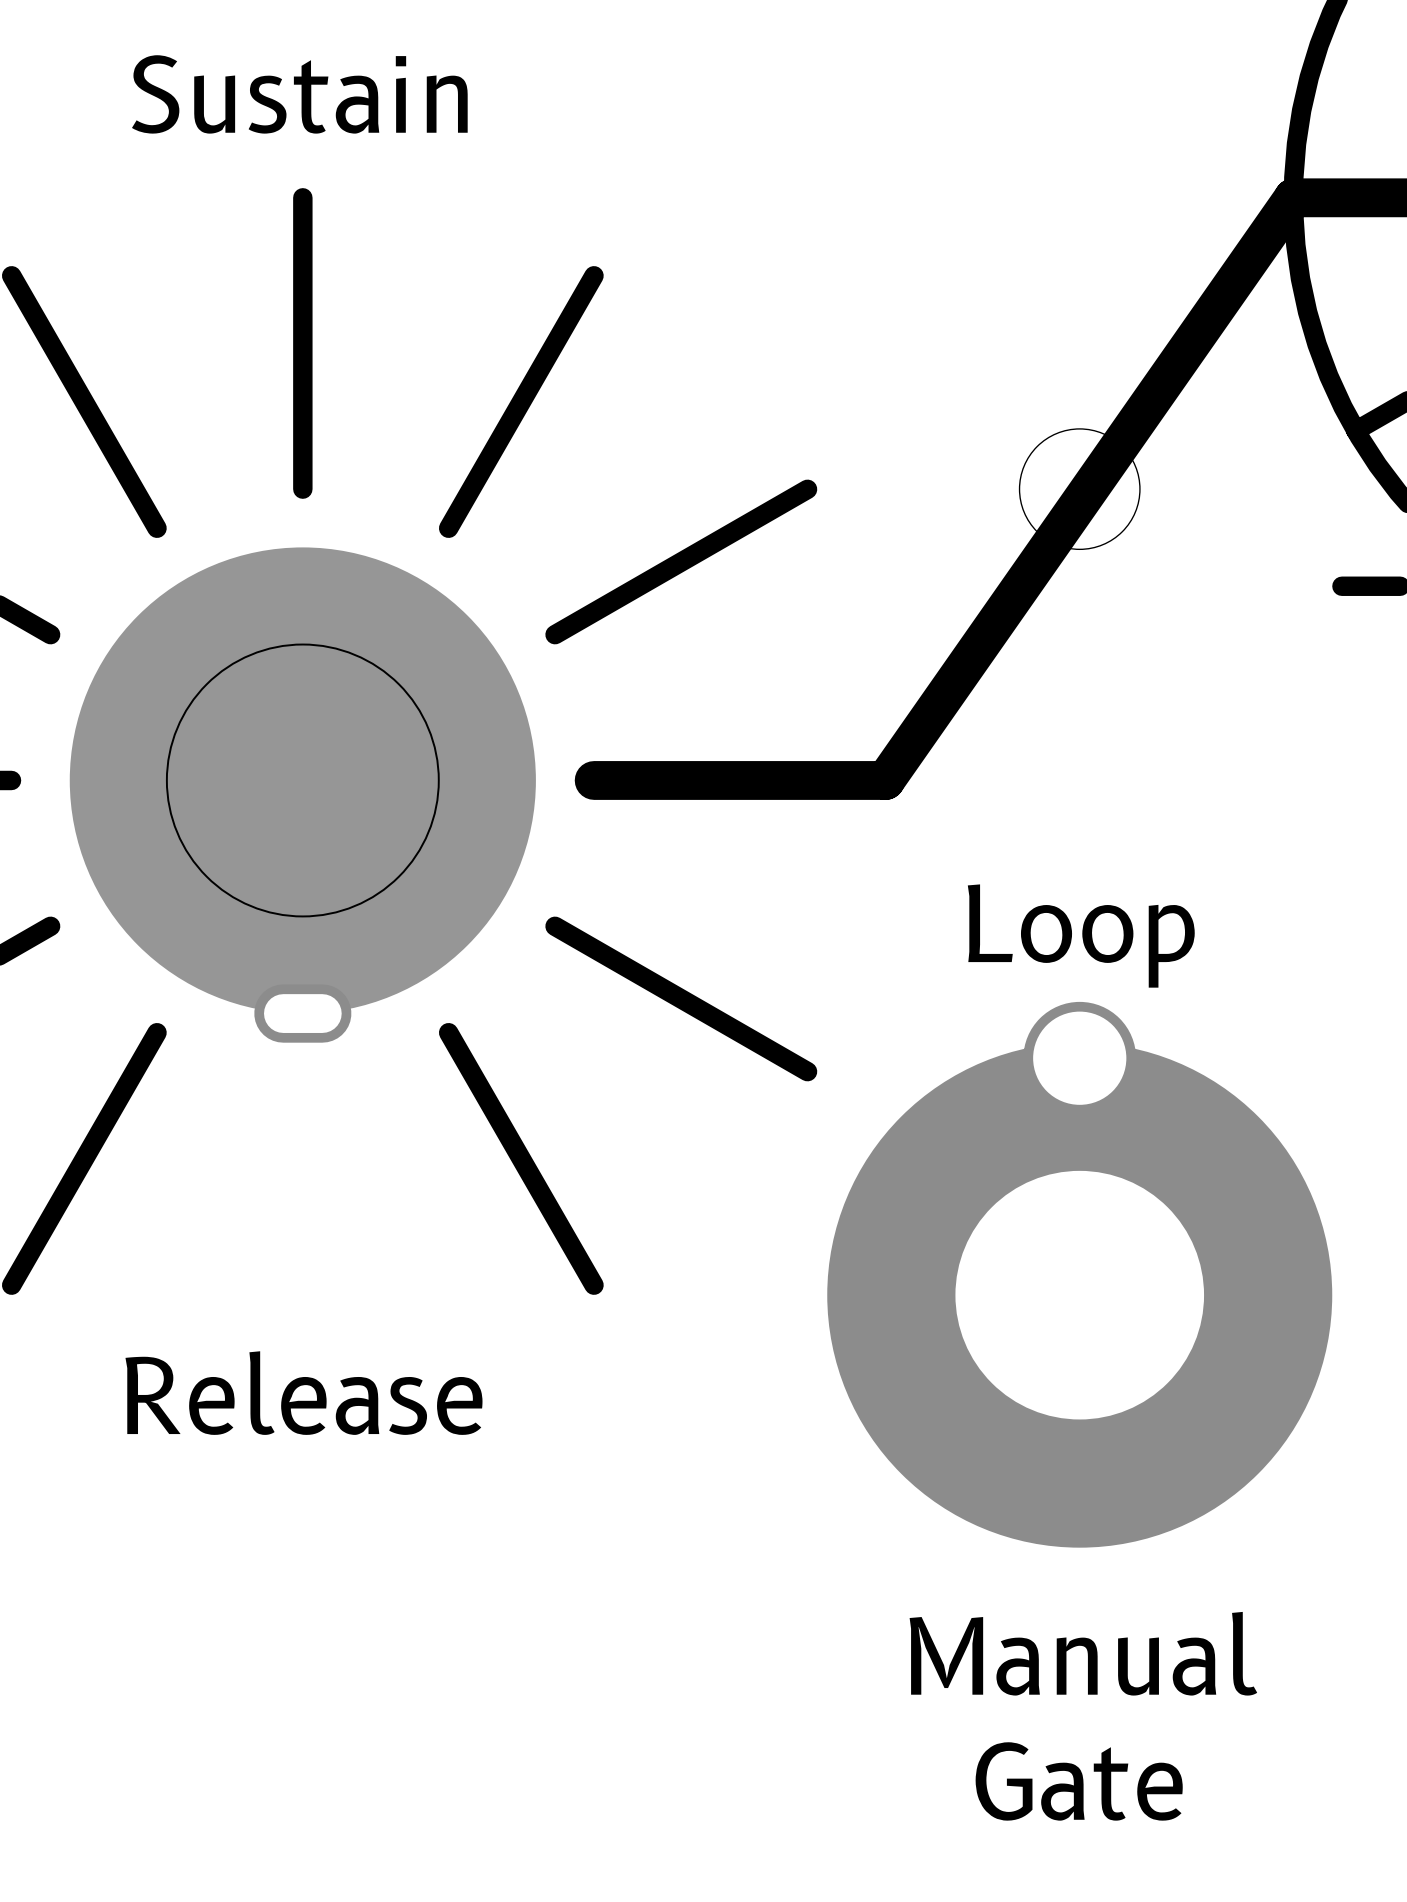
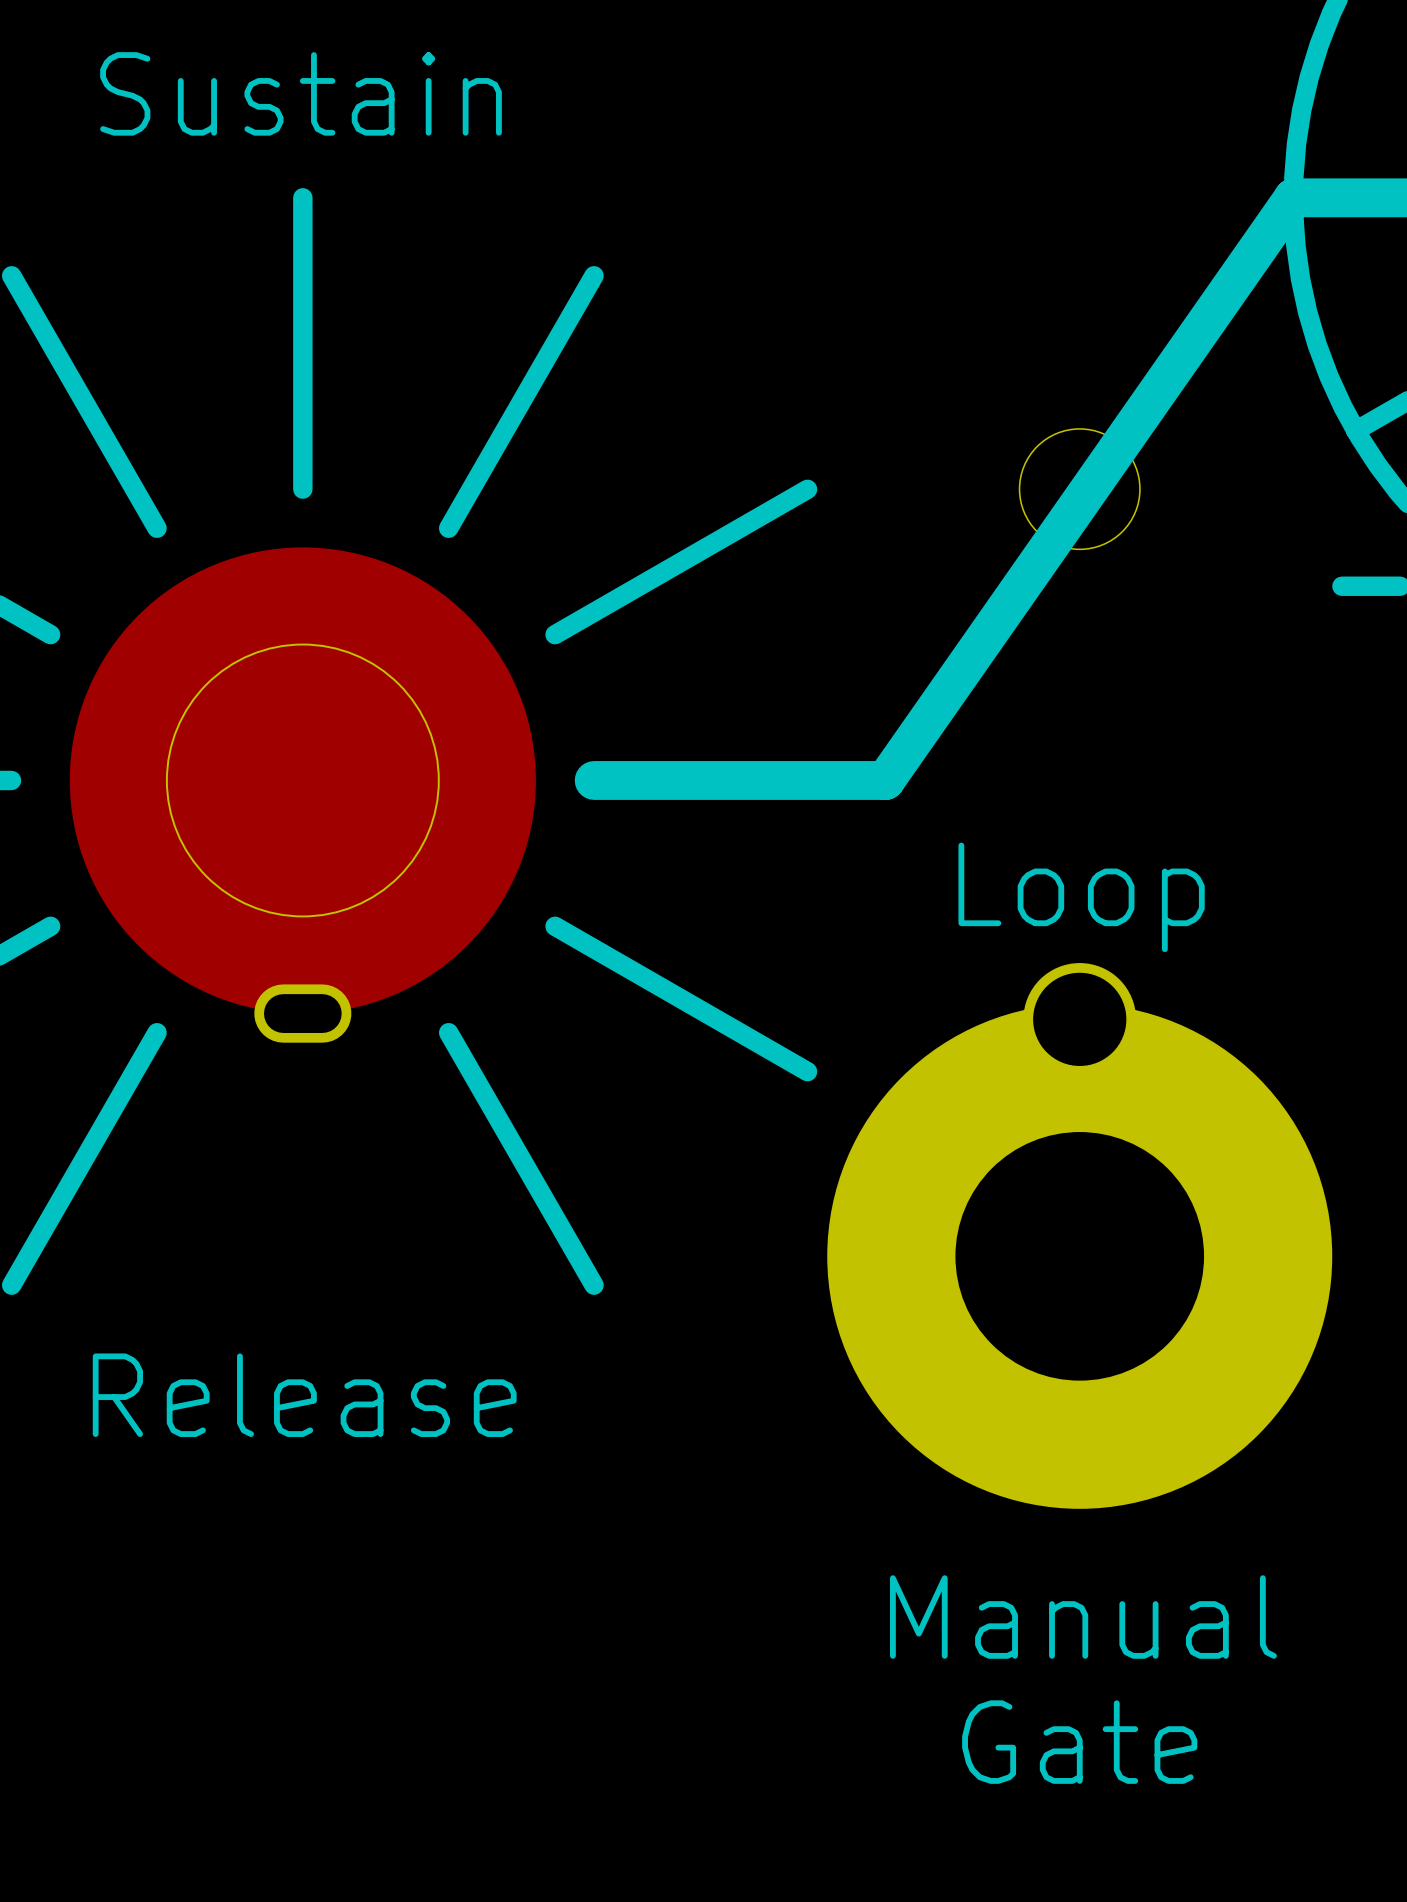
part position: (1079, 1274) -> (1079, 1235)
text position: Manual (1083, 1653) -> Manual (1083, 1617)
text position: Gate (1079, 1781) -> Gate (1079, 1742)

